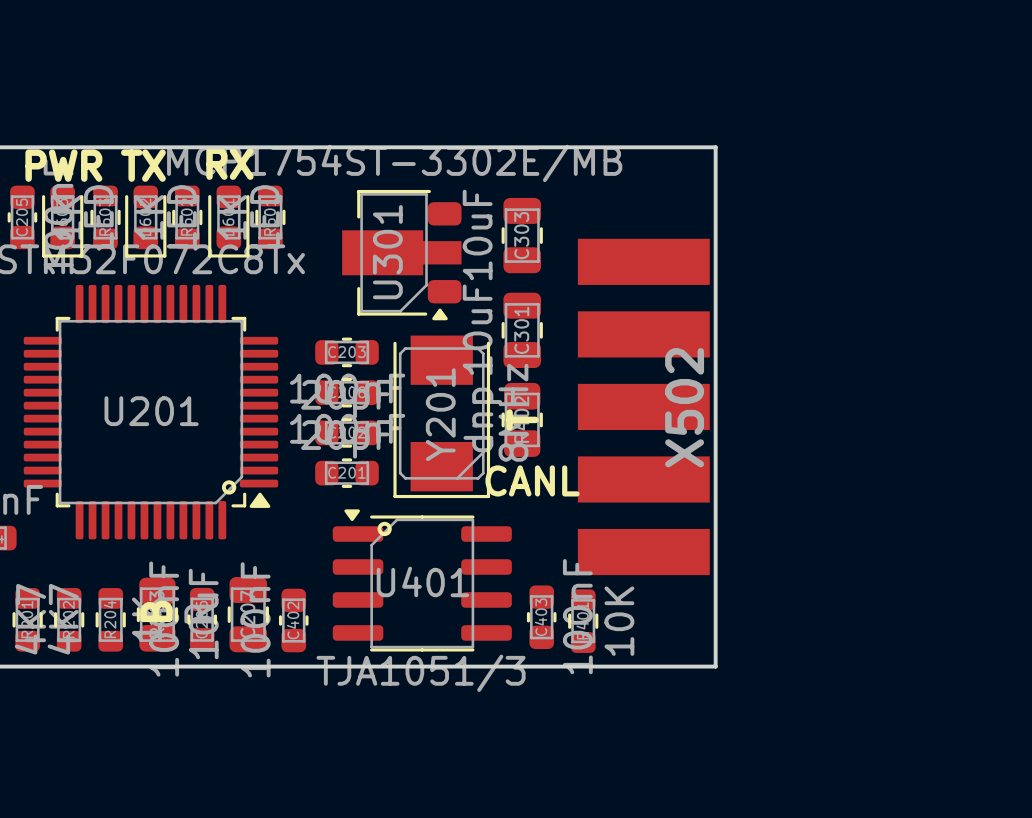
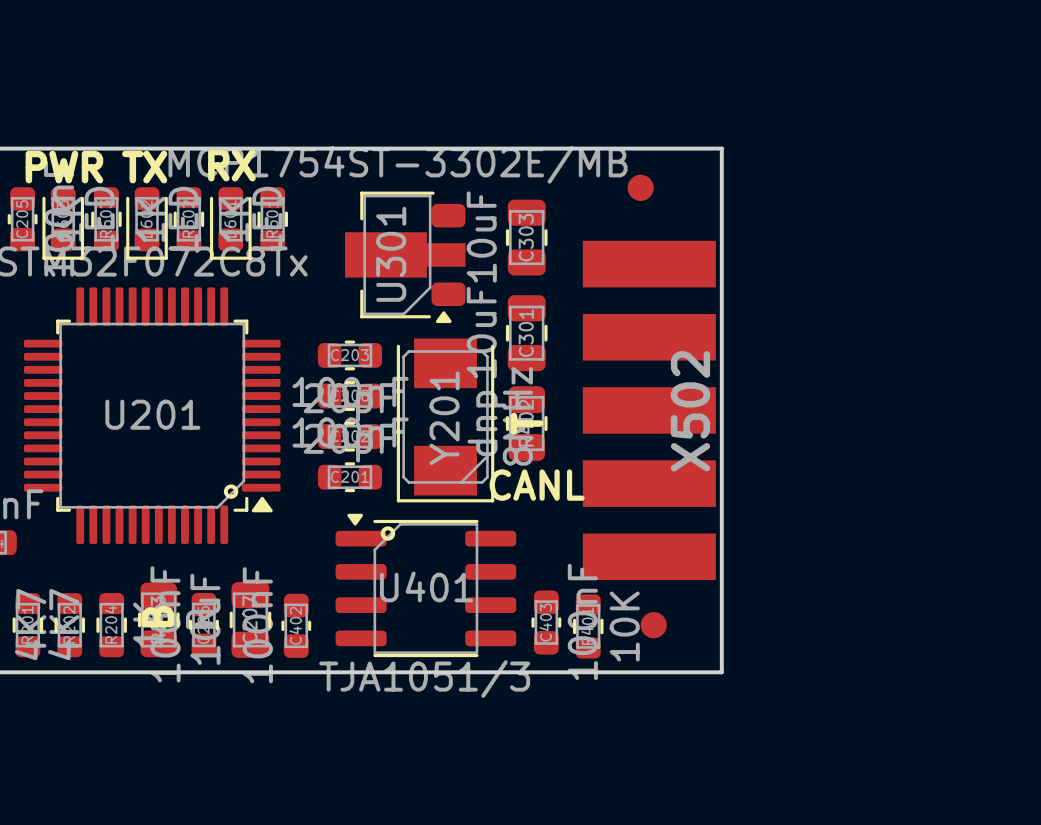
part: none -> (640, 187)
part: none -> (653, 625)

